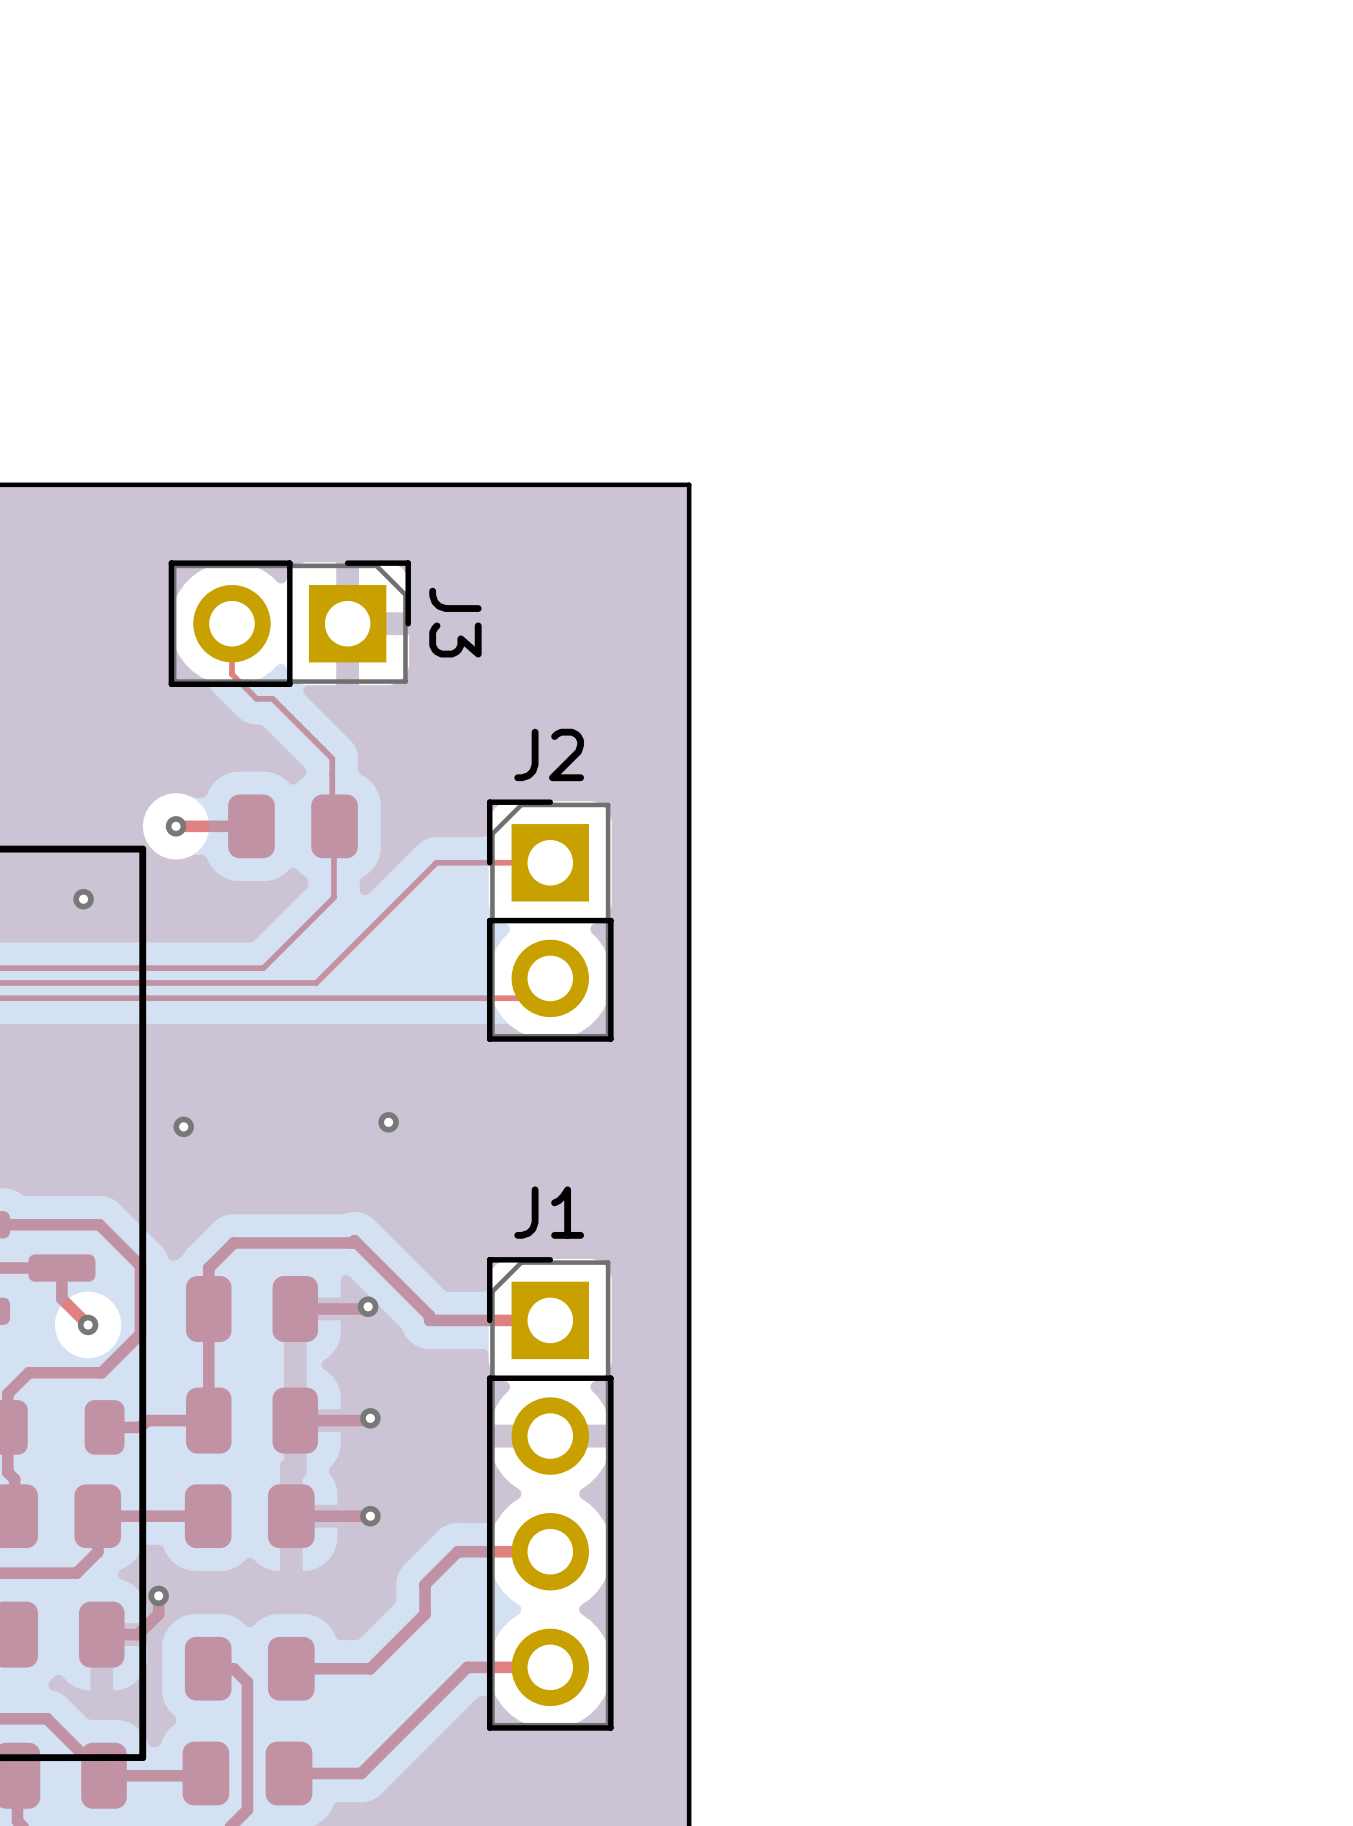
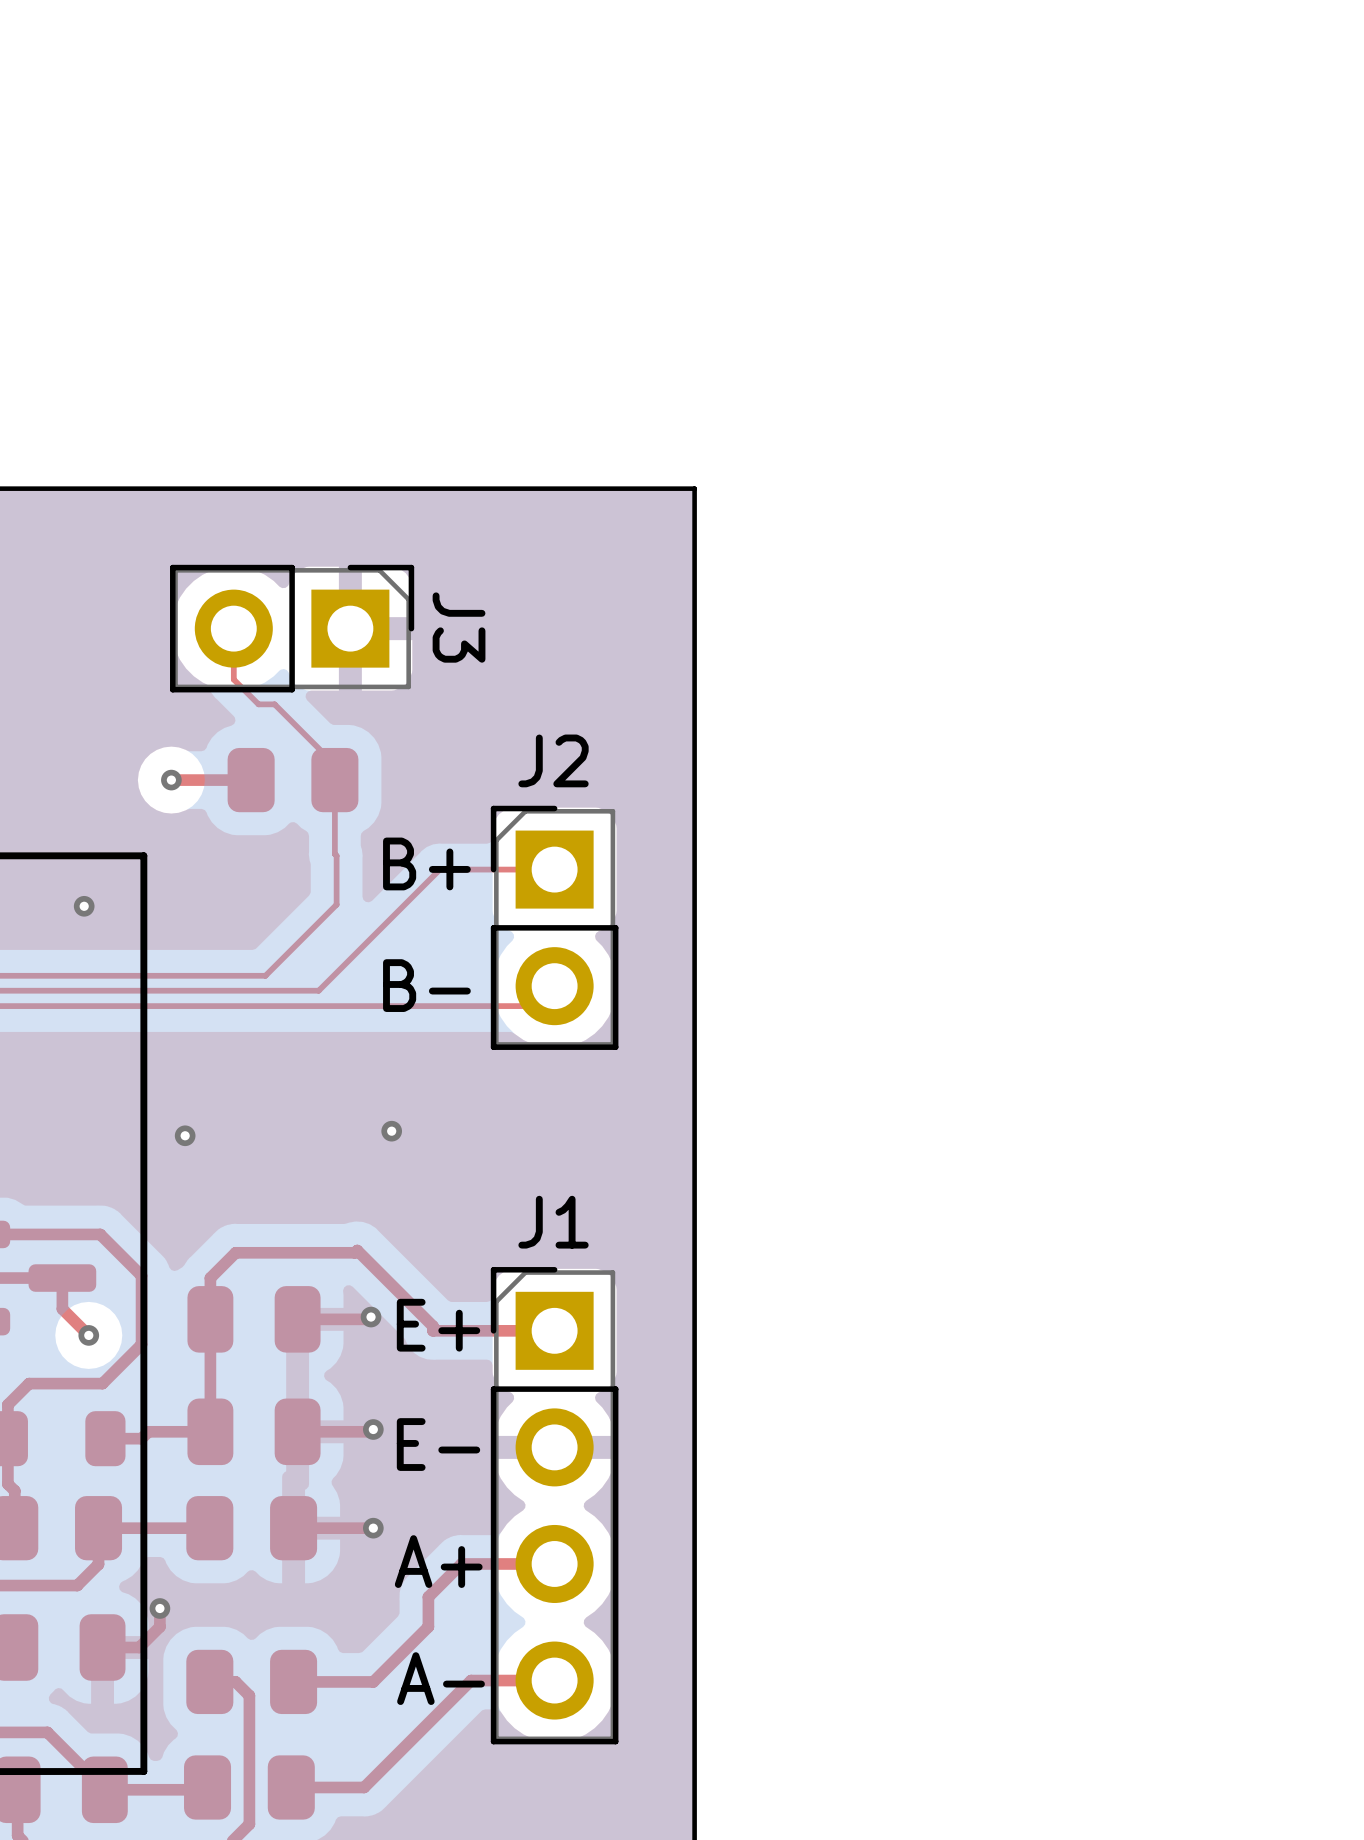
via position: (176, 826) -> (171, 780)
top track: (255, 826) (176, 826) -> (251, 780) (171, 780)
part position: (292, 826) -> (293, 780)
text: none -> B+ (426, 863)
text: none -> B- (426, 985)
text: none -> E+ (438, 1325)
text: none -> E- (438, 1444)
text: none -> A+ (438, 1561)
text: none -> A- (441, 1678)

